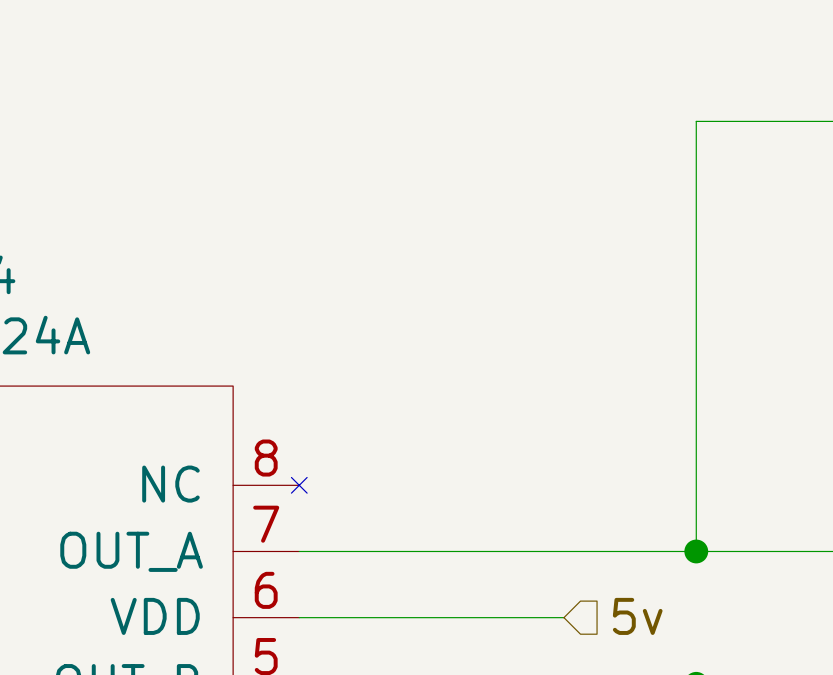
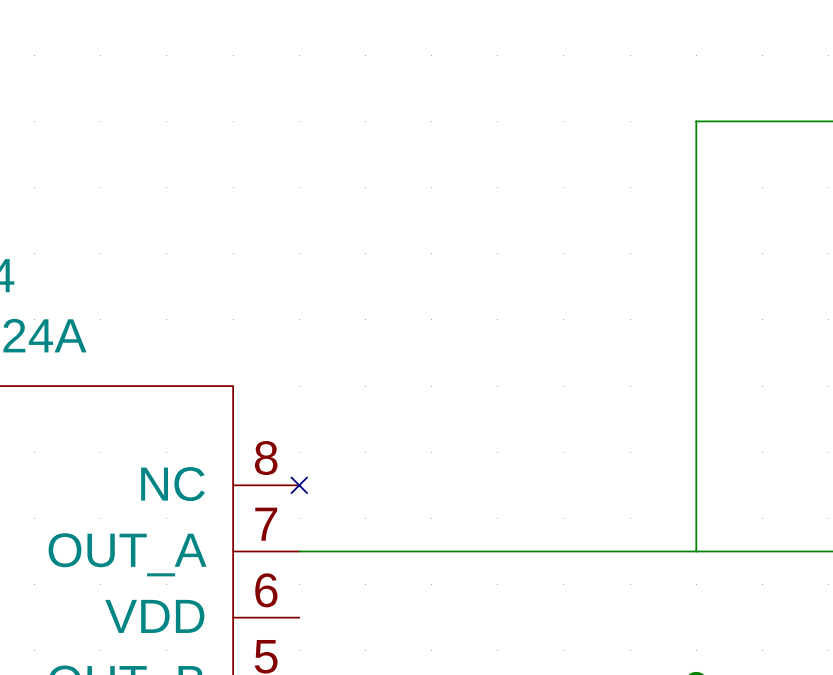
junction: (696, 551) -> none
hierarchical label: 5v (637, 616) -> none
wire: (299, 617) (563, 617) -> none

